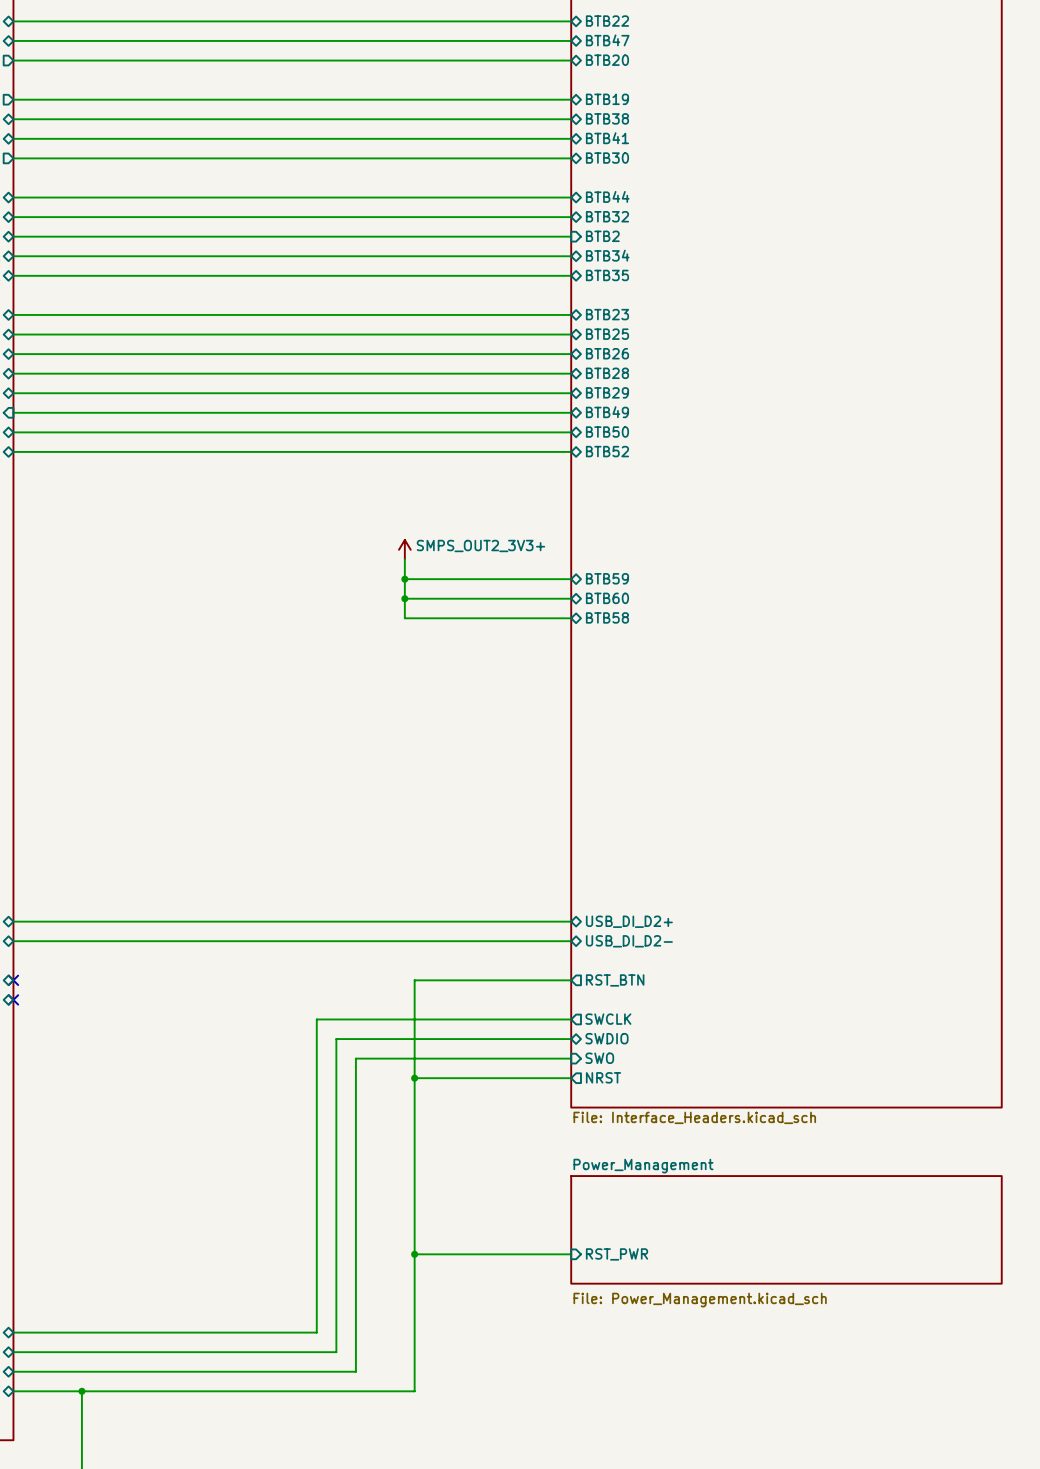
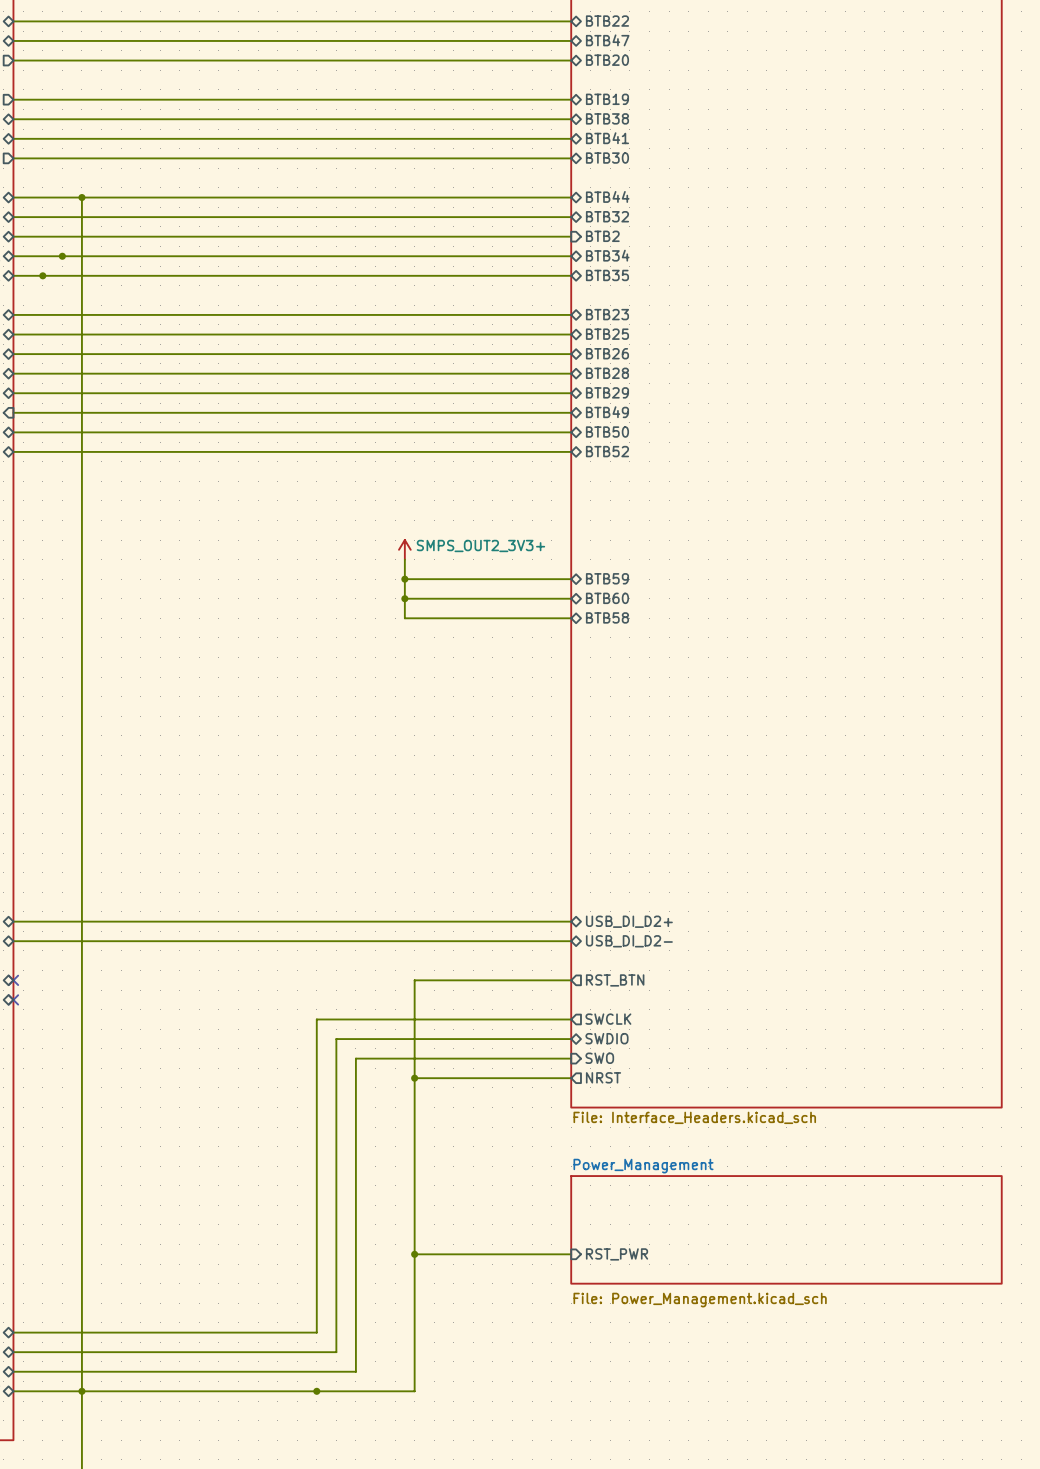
wire: none -> (81, 197) (81, 1391)
junction: none -> (81, 197)
junction: none -> (62, 256)
junction: none -> (42, 275)
junction: none -> (316, 1391)

